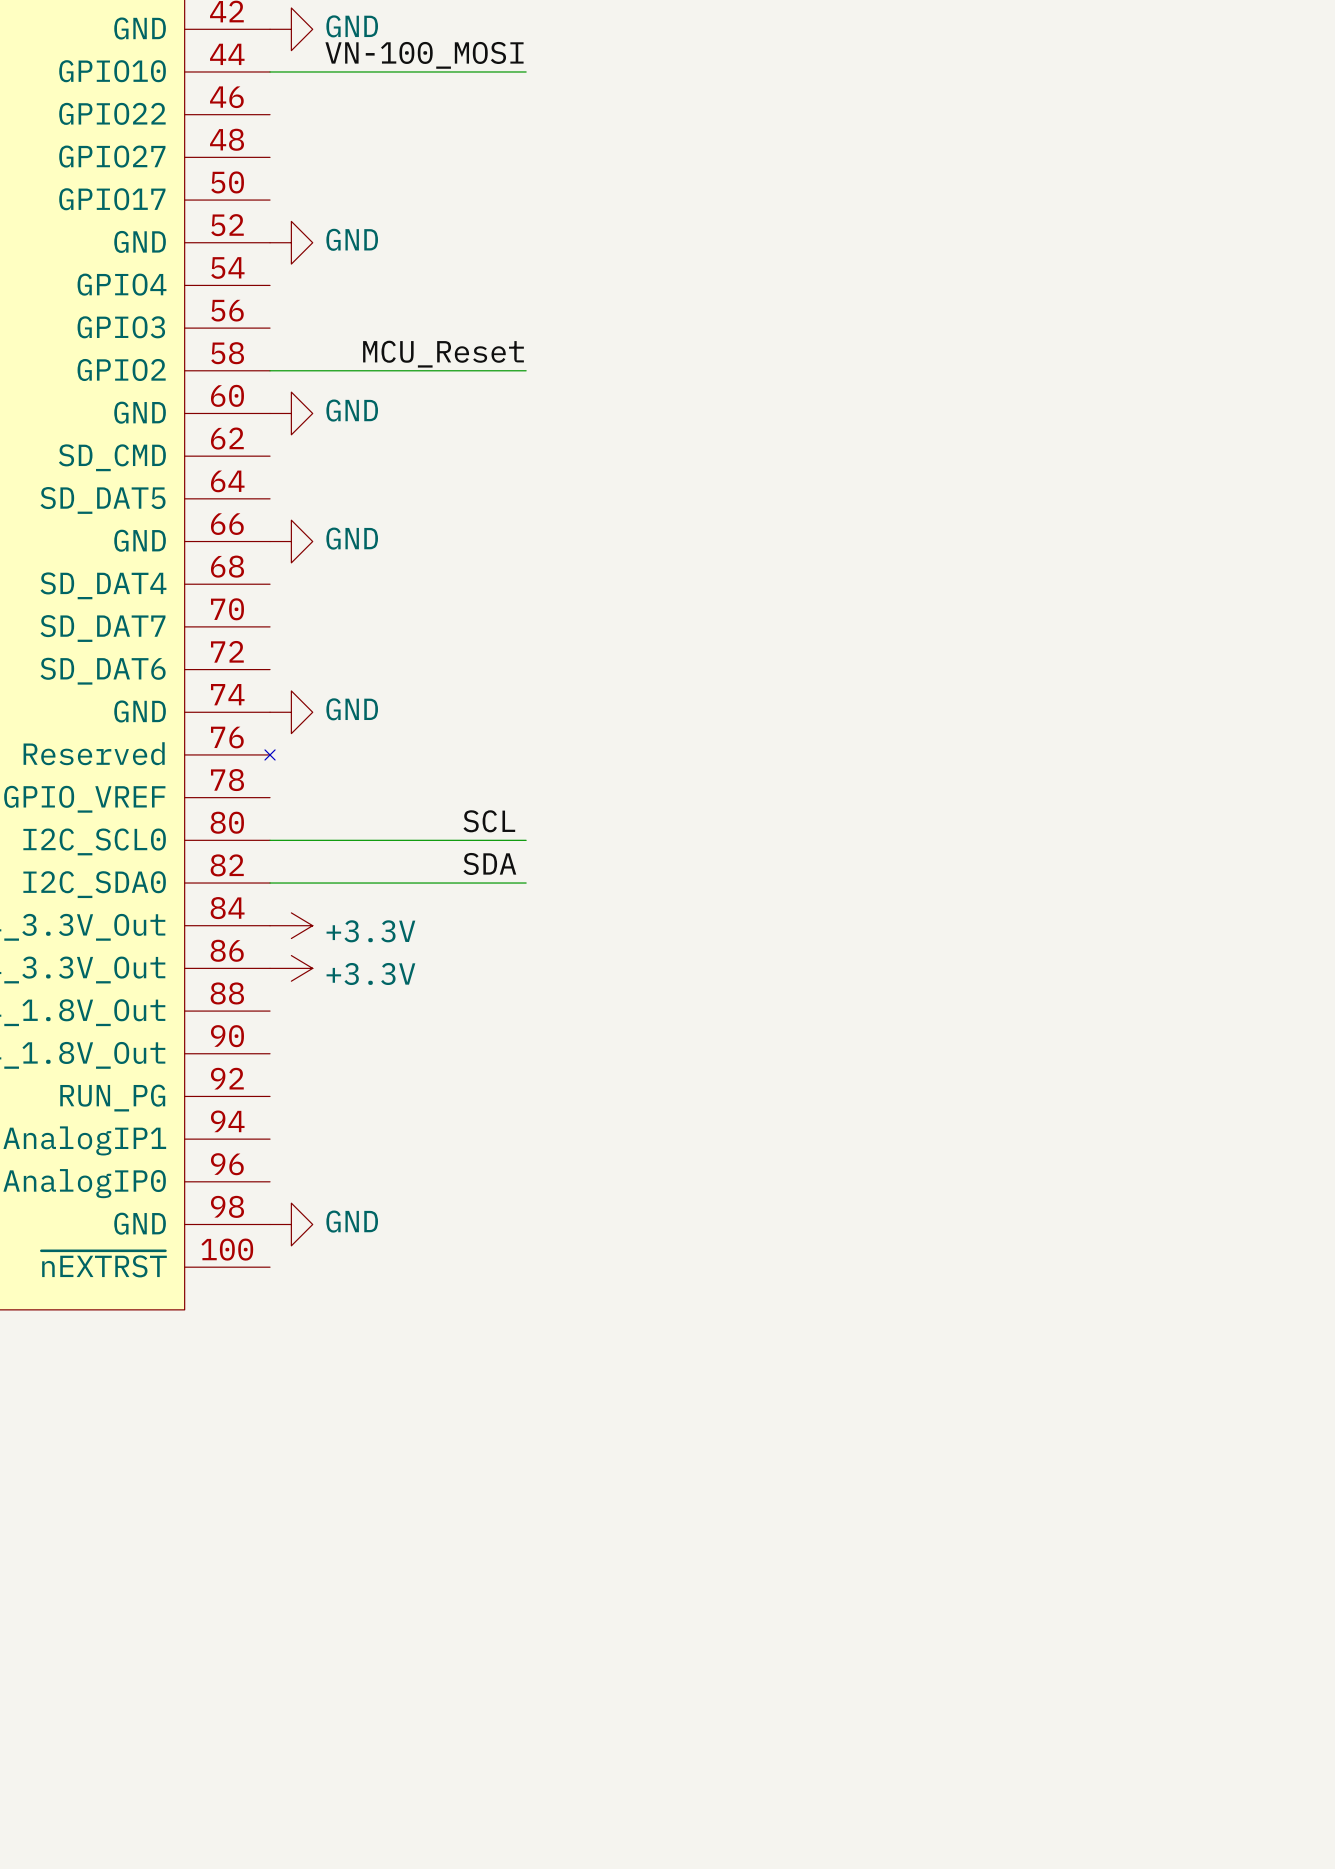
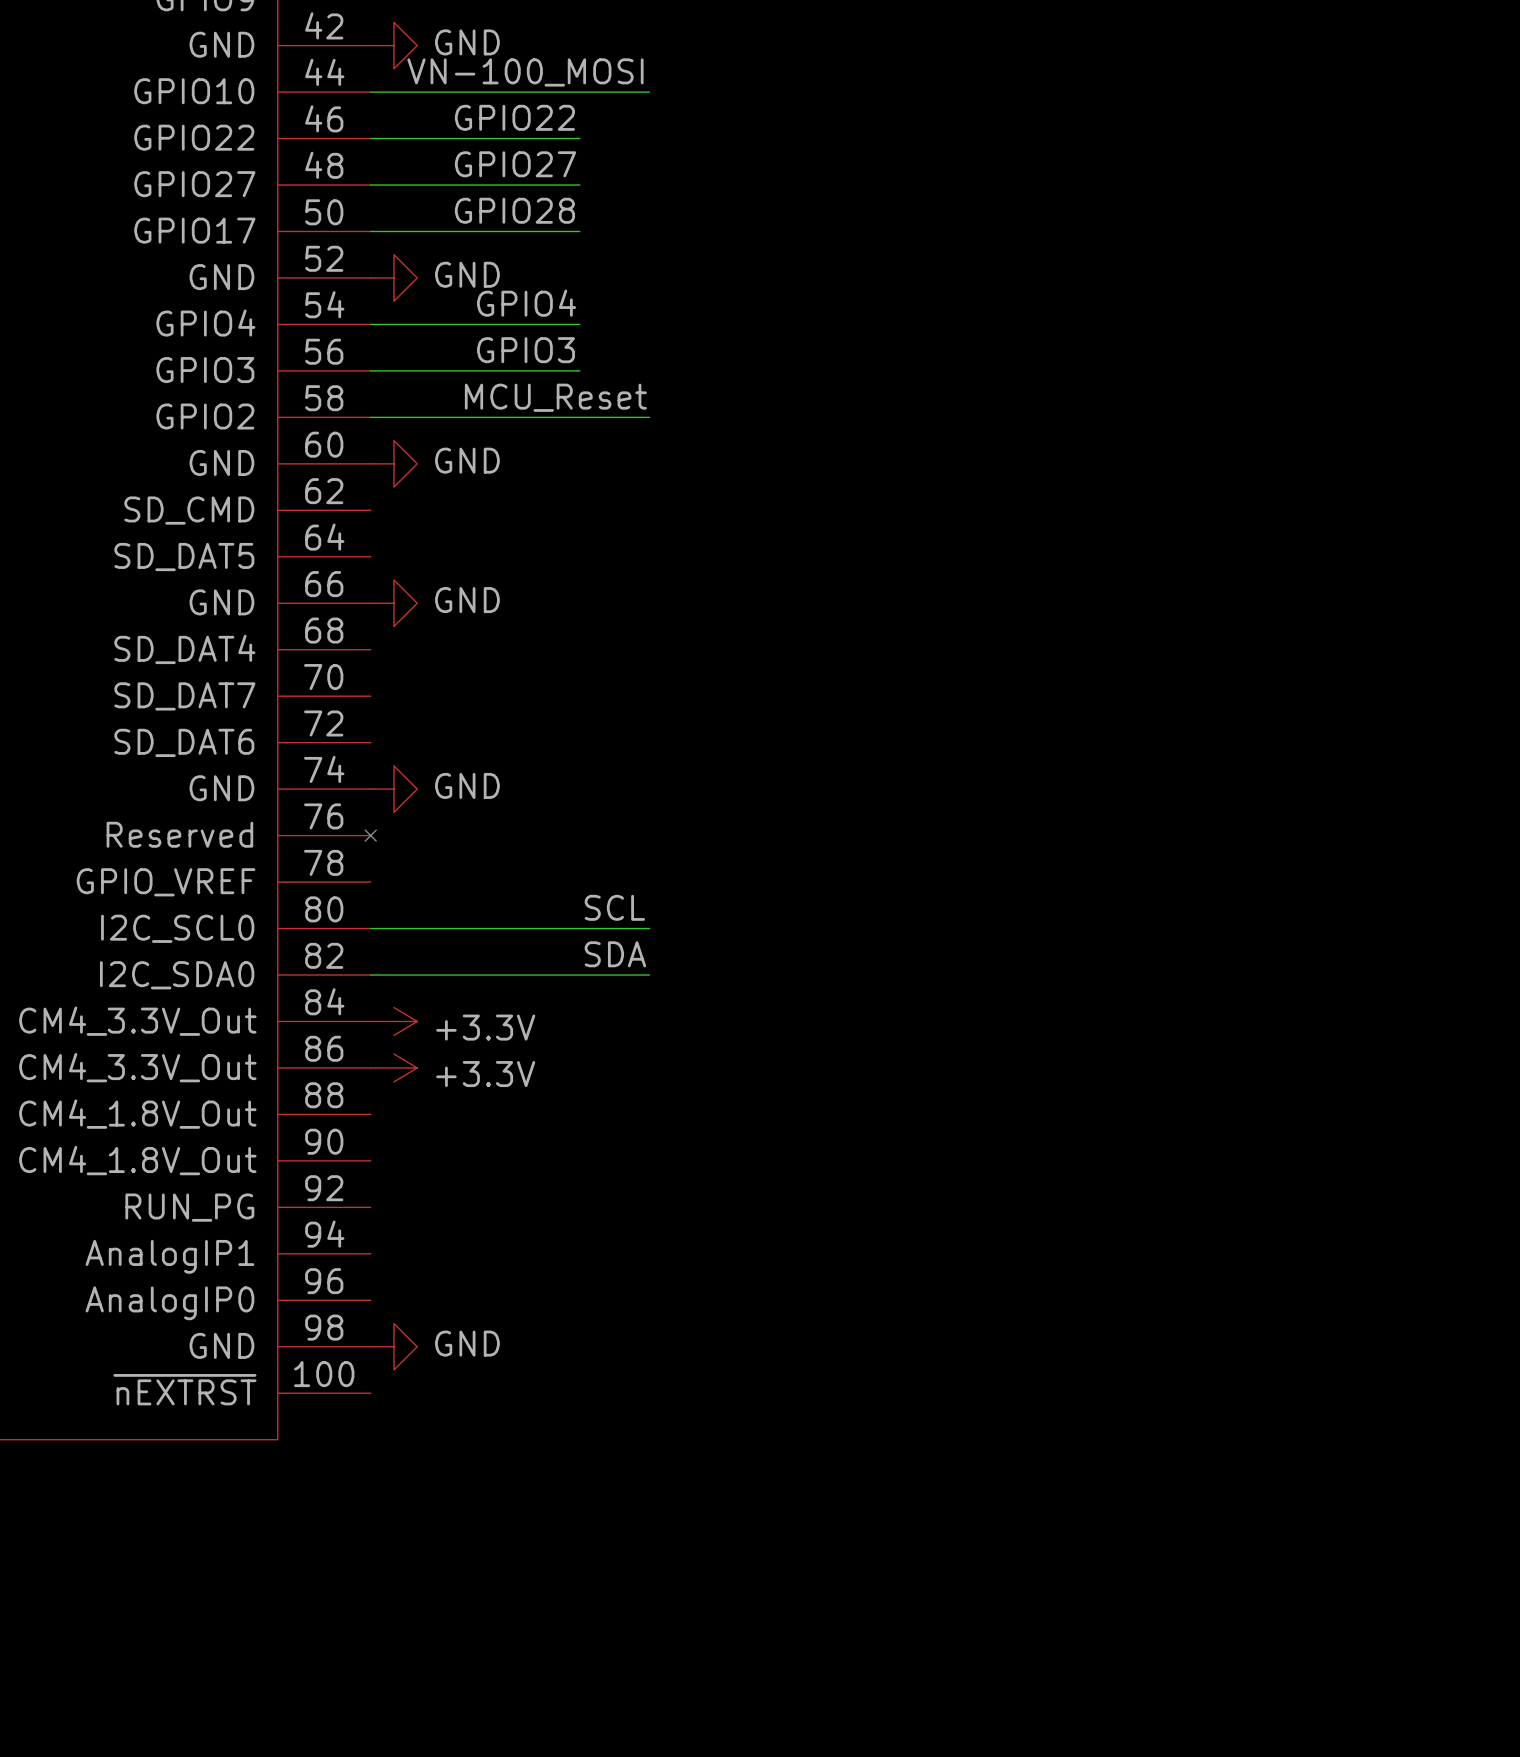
label: none -> GPIO22 (514, 117)
wire: none -> (370, 138) (579, 138)
label: none -> GPIO27 (515, 164)
wire: none -> (370, 185) (579, 185)
label: none -> GPIO28 (514, 210)
wire: none -> (370, 231) (579, 231)
label: none -> GPIO4 (526, 303)
wire: none -> (370, 324) (579, 324)
label: none -> GPIO3 (526, 350)
wire: none -> (370, 370) (579, 370)

